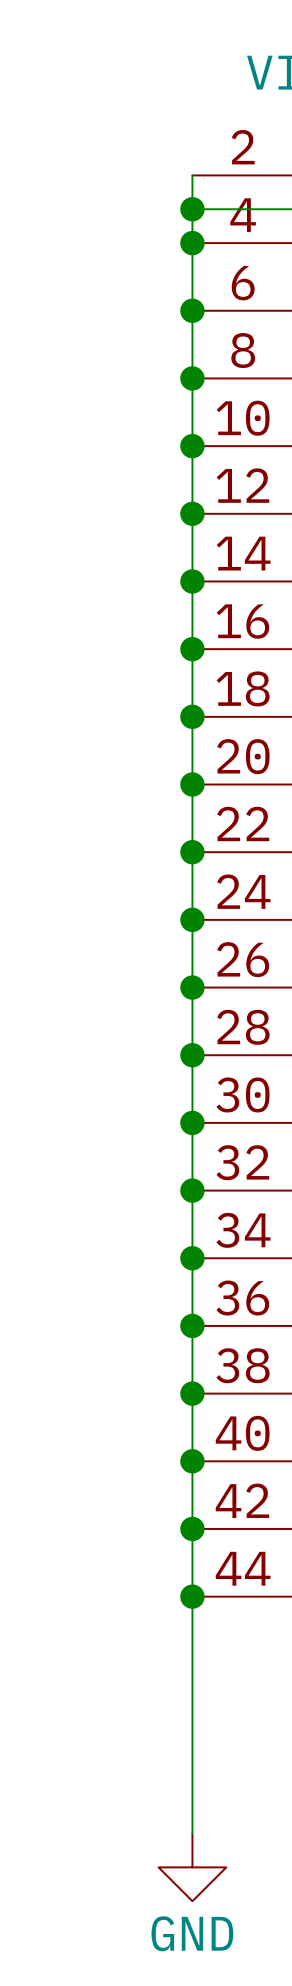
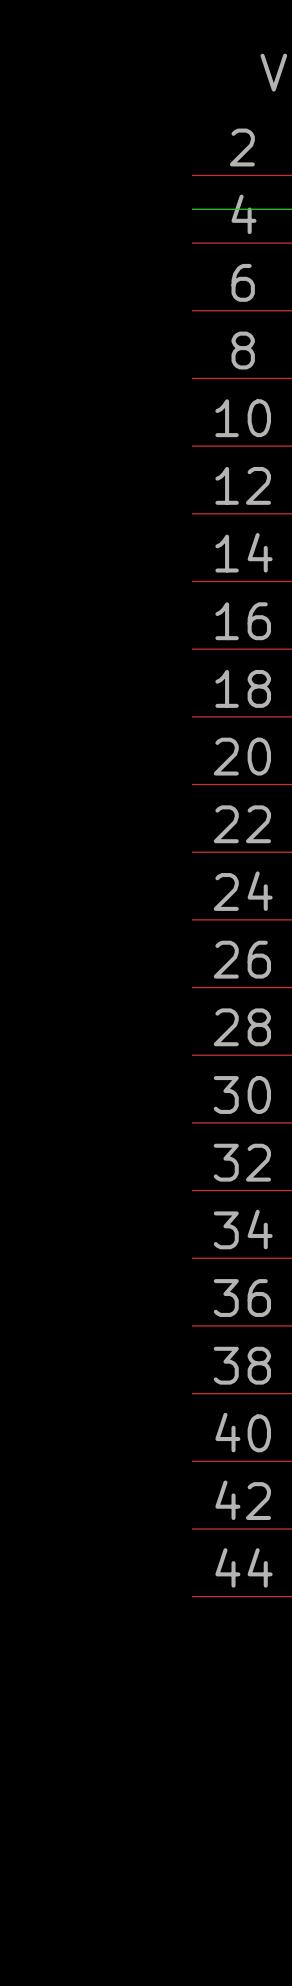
wire: (192, 175) (192, 1833) -> none
junction: (192, 209) -> none
junction: (192, 243) -> none
junction: (192, 310) -> none
junction: (192, 378) -> none
junction: (192, 446) -> none
junction: (192, 513) -> none
junction: (192, 581) -> none
junction: (192, 649) -> none
junction: (192, 716) -> none
junction: (192, 784) -> none
junction: (192, 852) -> none
junction: (192, 919) -> none
junction: (192, 987) -> none
junction: (192, 1055) -> none
junction: (192, 1122) -> none
junction: (192, 1190) -> none
junction: (192, 1258) -> none
junction: (192, 1325) -> none
junction: (192, 1393) -> none
junction: (192, 1461) -> none
junction: (192, 1528) -> none
junction: (192, 1596) -> none
power symbol: GND (192, 1867) -> none

